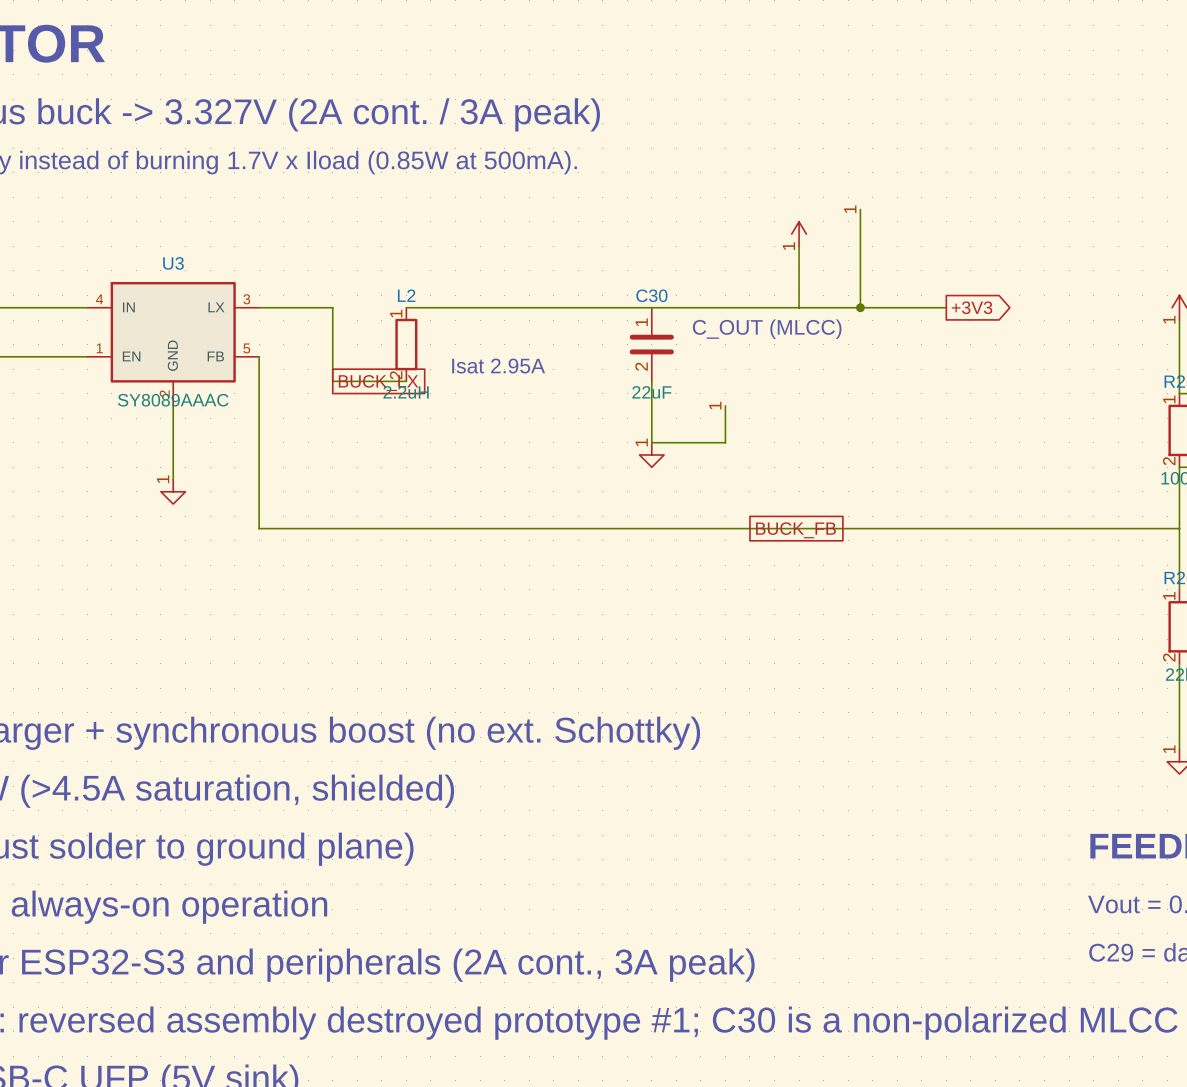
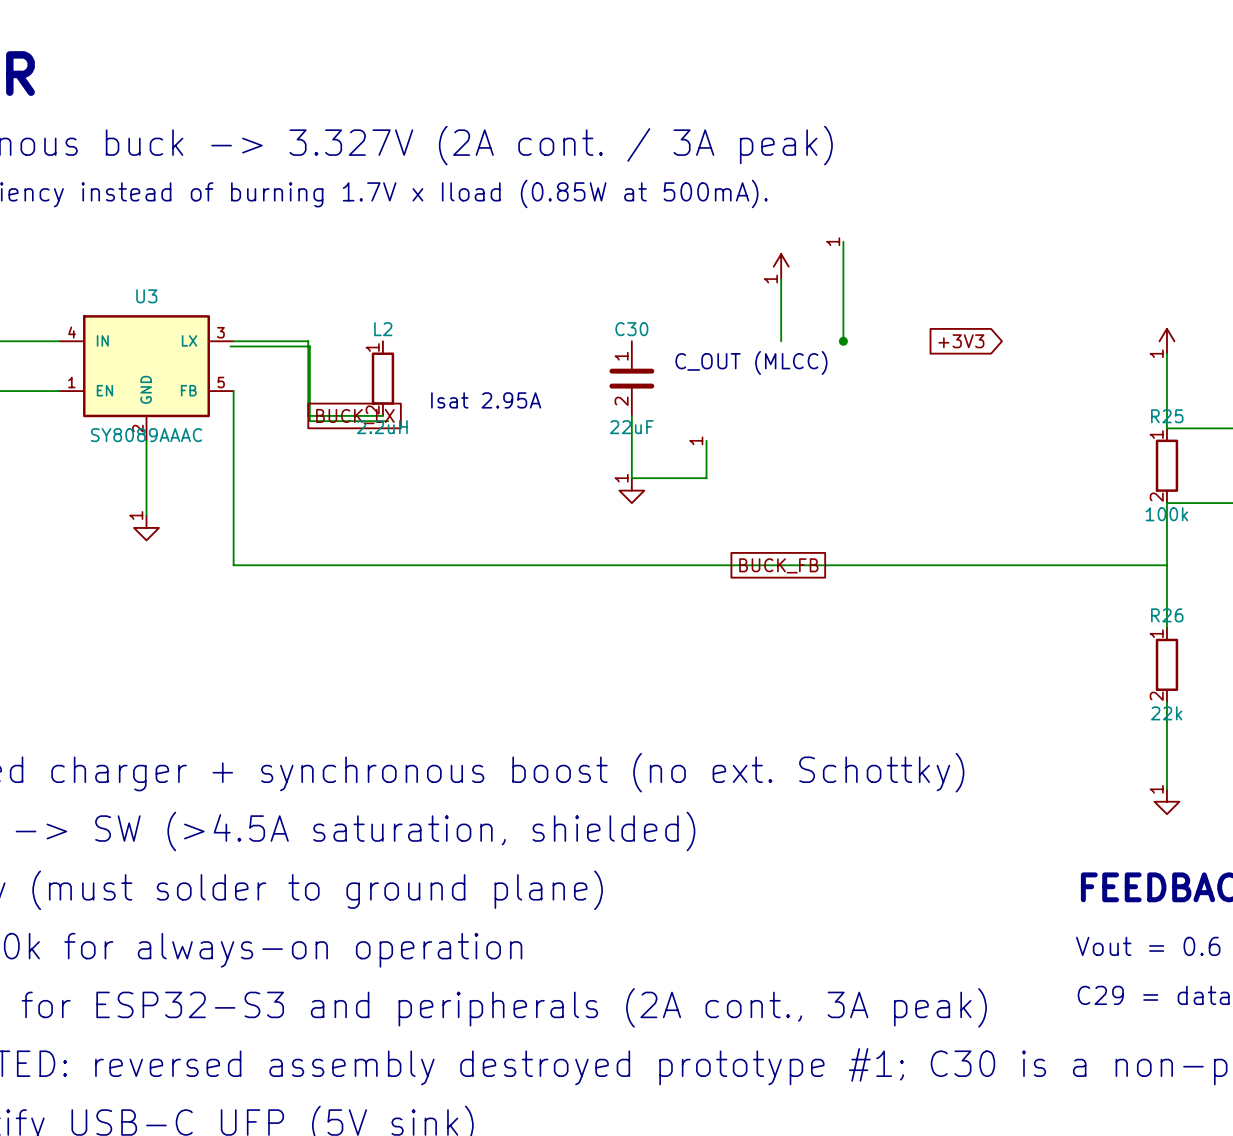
wire: (406, 307) (946, 307) -> none
wire: none -> (230, 346) (309, 346) (309, 421) (388, 421)

